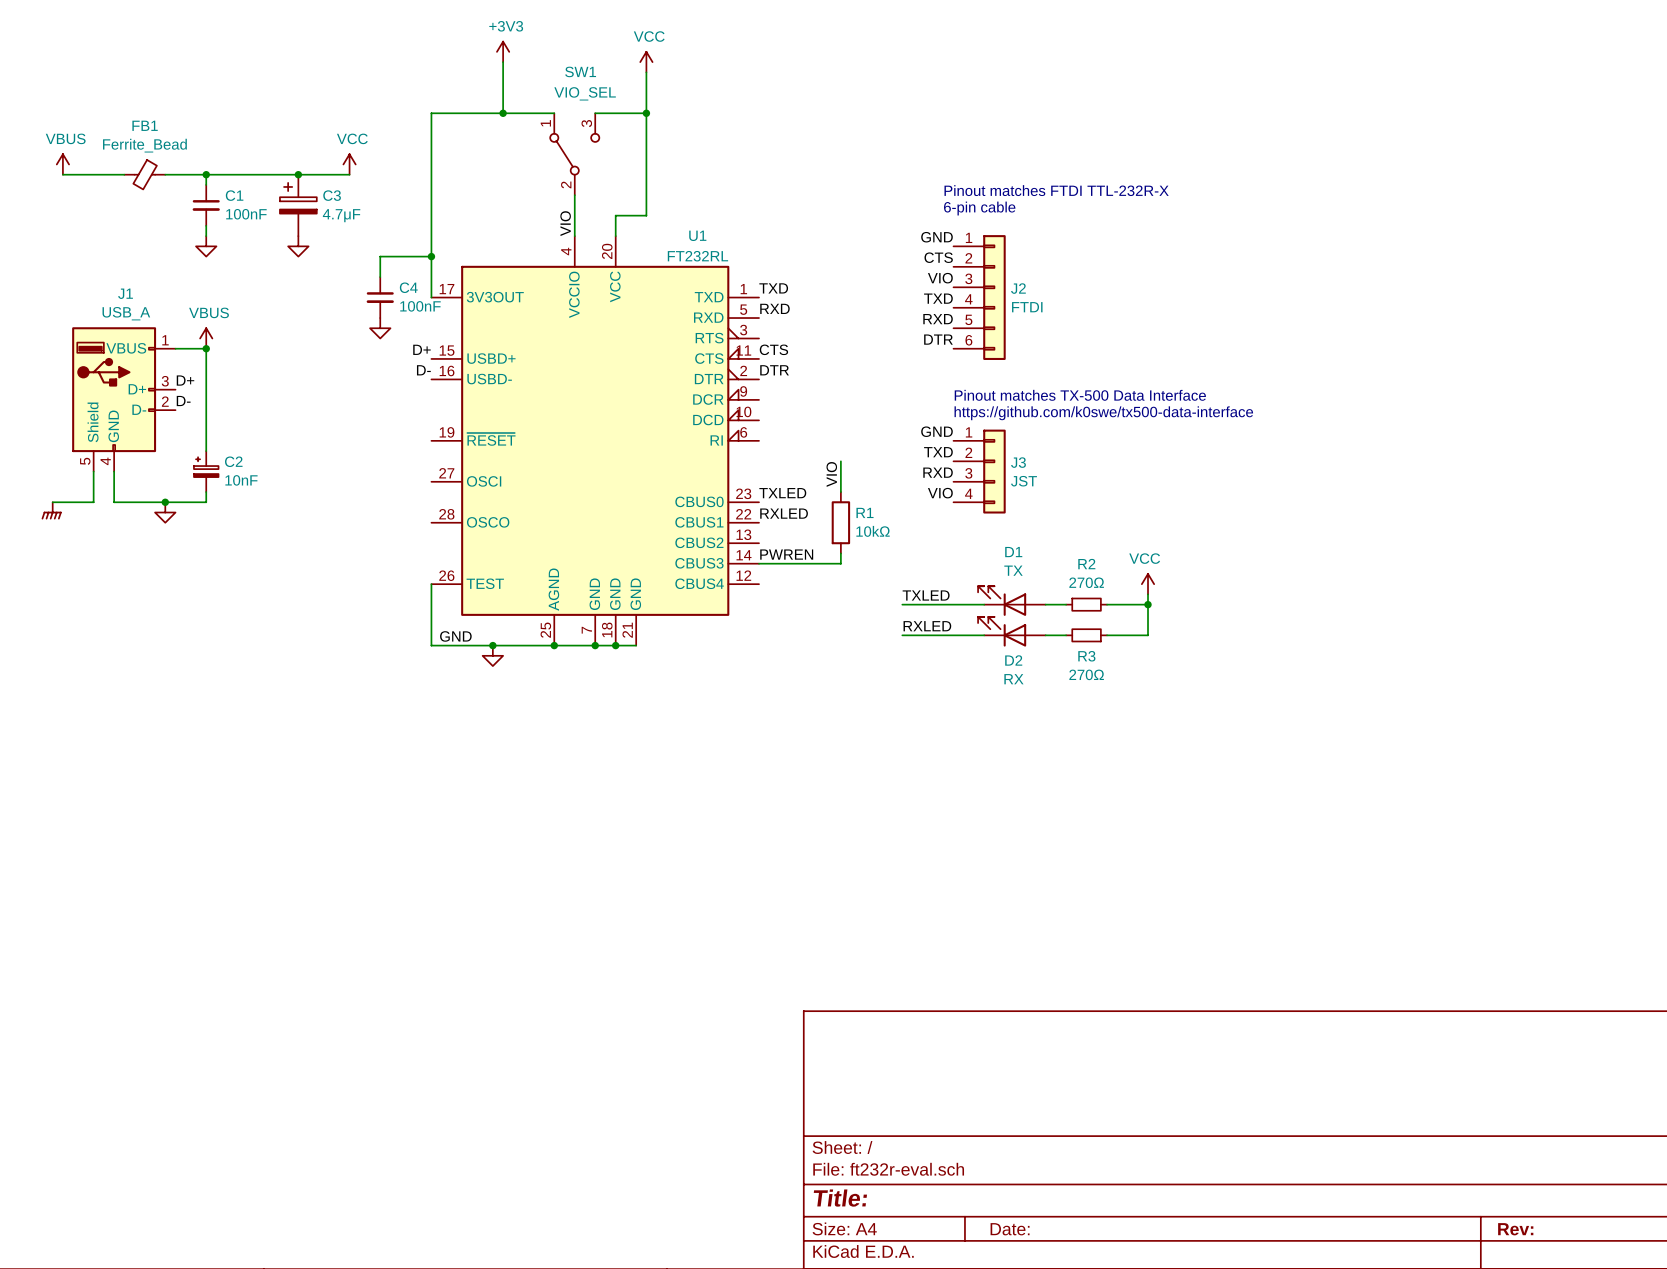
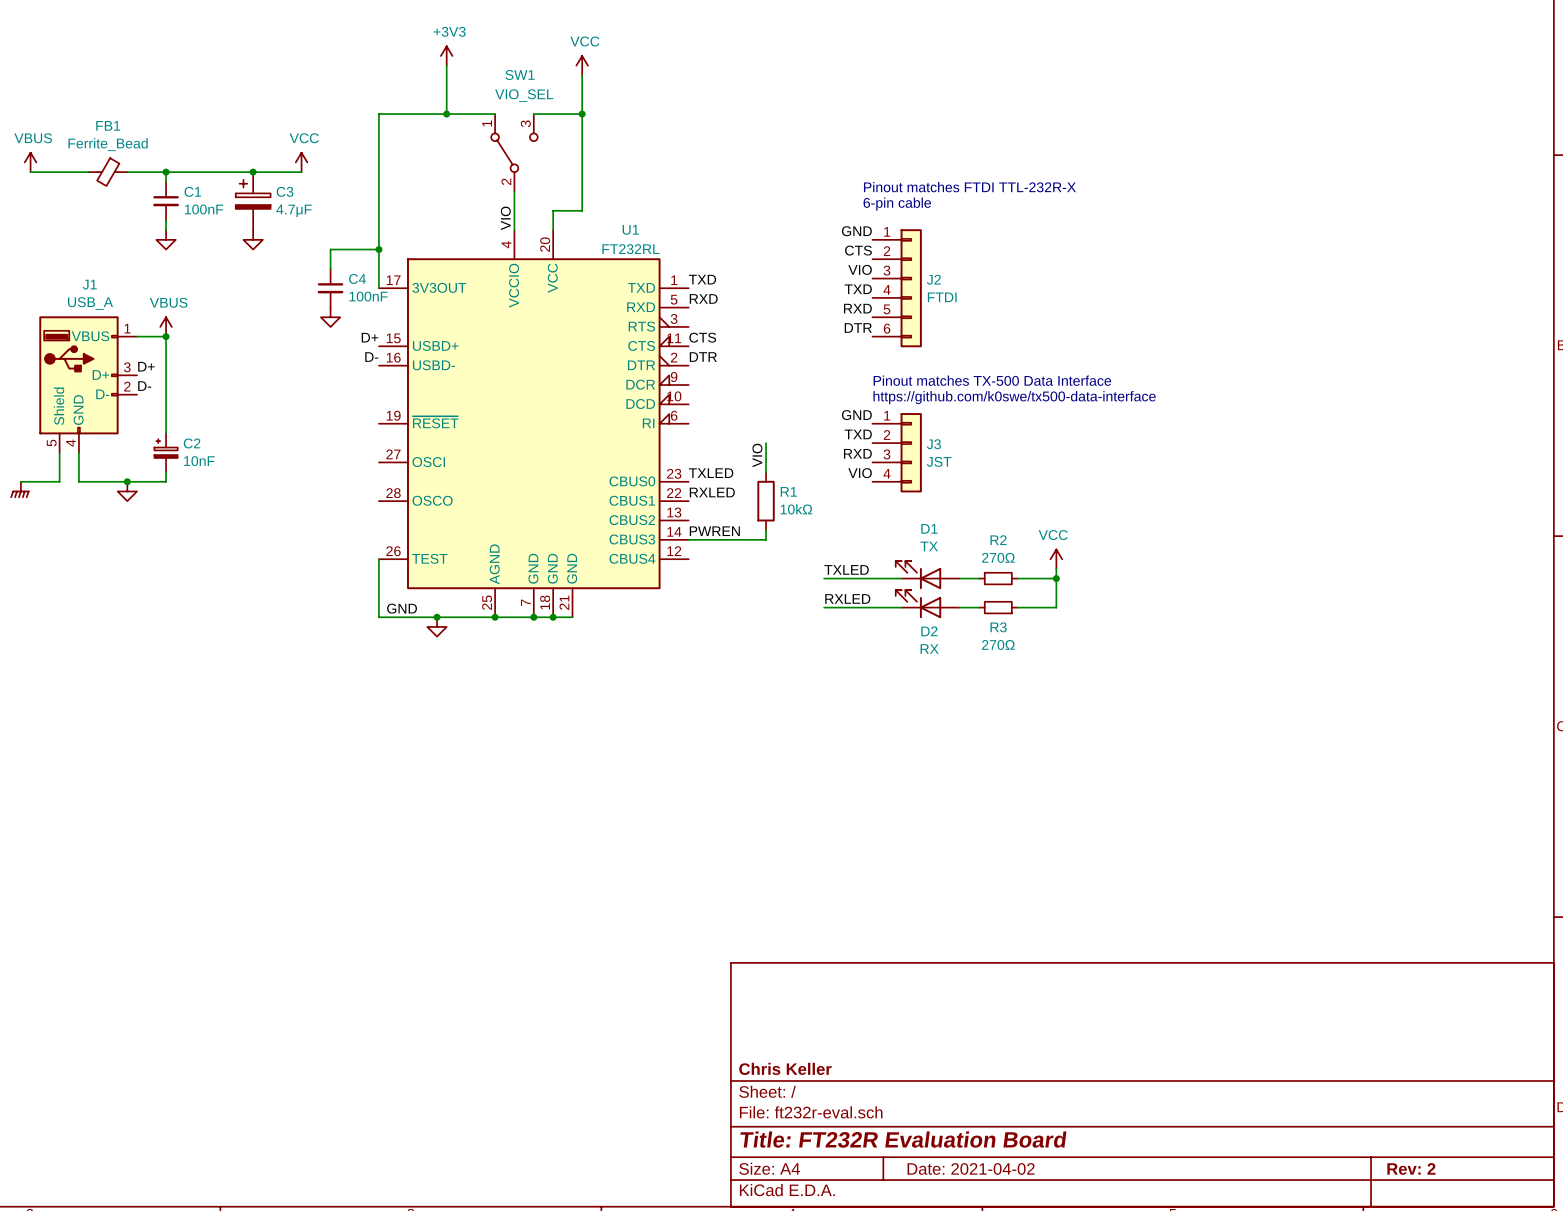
title block: none -> Chris Keller (785, 1068)
title block: Title: (840, 1198) -> Title: FT232R Evaluation Board (903, 1139)
title block: Date: (1010, 1229) -> Date: 2021-04-02 (971, 1168)
title block: Rev: (1515, 1229) -> Rev: 2 (1411, 1168)

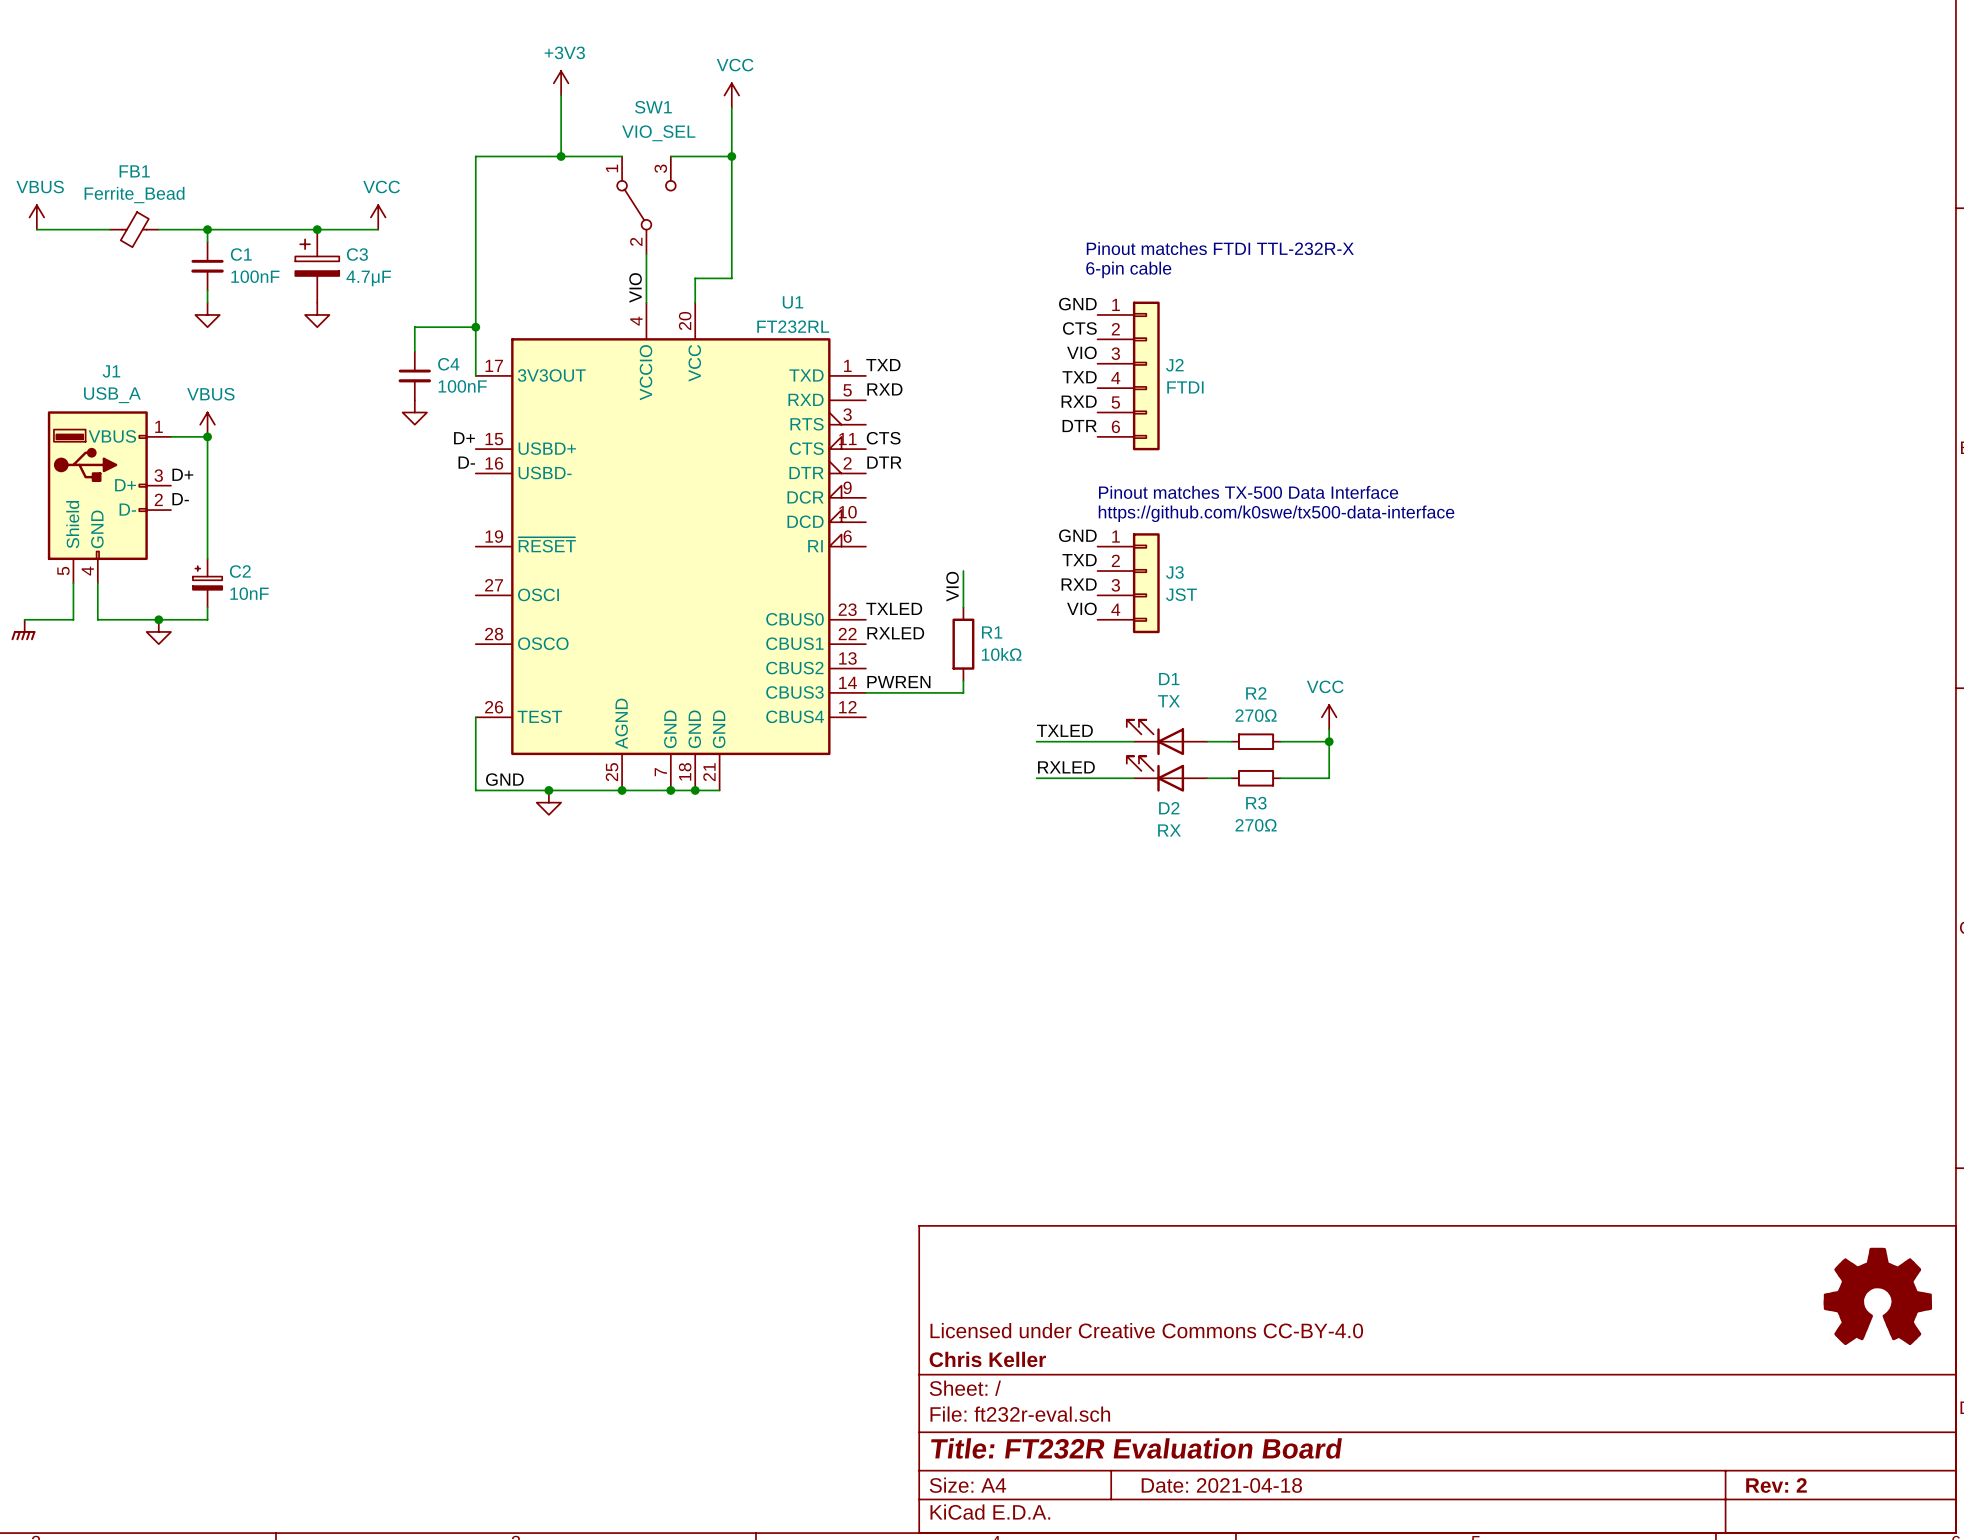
part: none -> (1877, 1296)
title block: none -> Licensed under Creative Commons CC-BY-4.0 (1146, 1330)
title block: Date: 2021-04-02 (971, 1168) -> Date: 2021-04-18 (1221, 1485)

